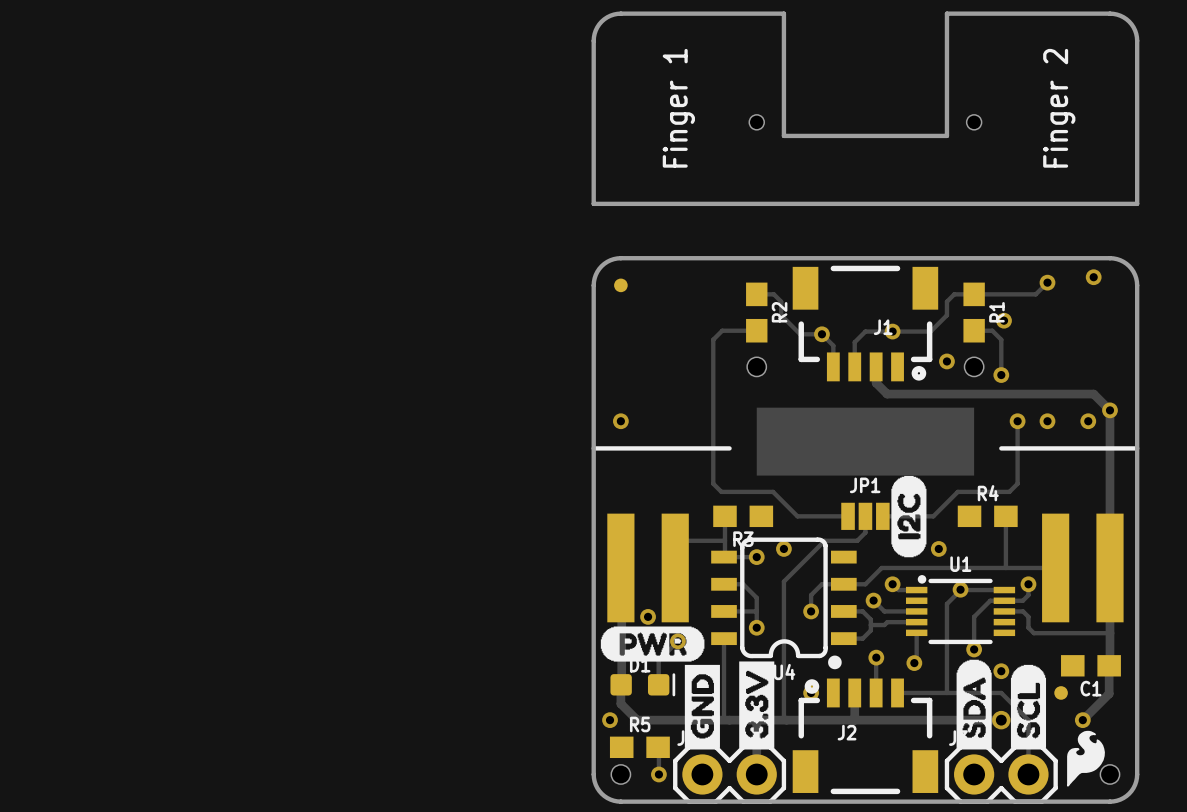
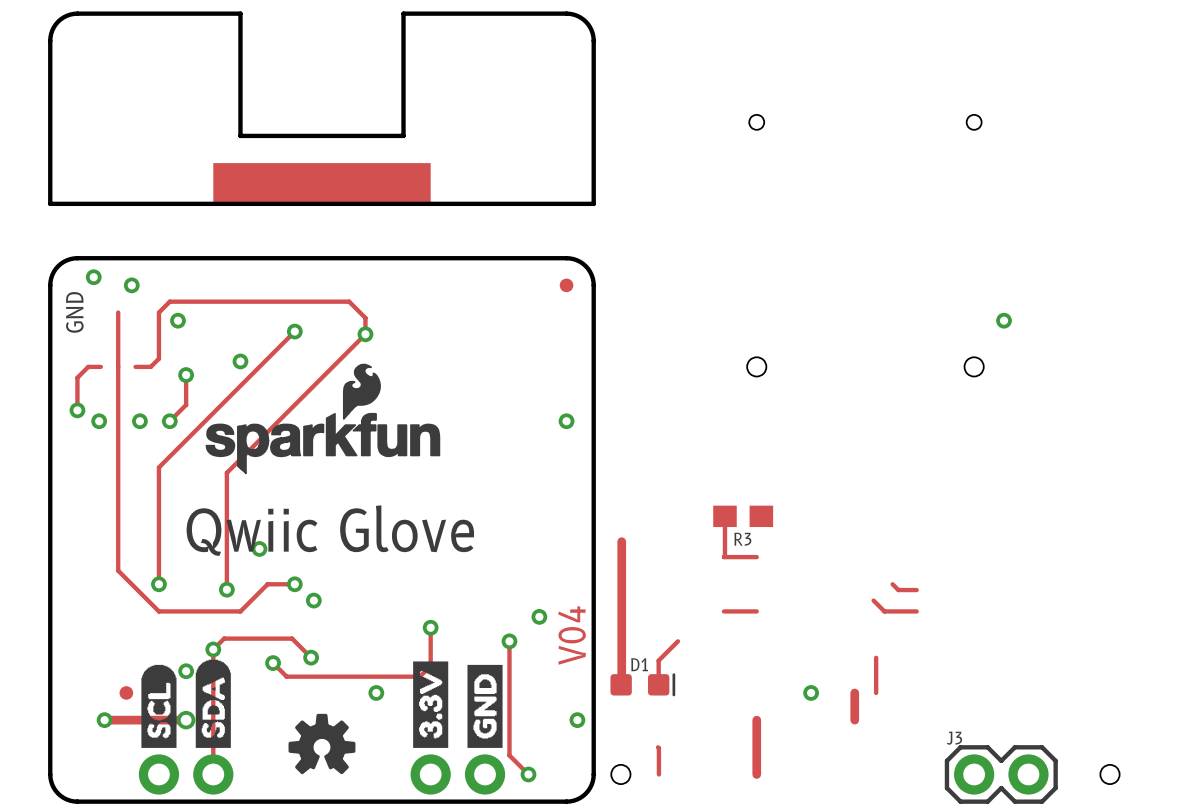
board edge: (593, 40) (599, 24) (607, 17) (617, 13) (783, 13) (783, 135) (946, 135) (946, 13) (1113, 13) (1123, 17) (1131, 24) (1137, 40) (1137, 203) (593, 203) -> (593, 40) (588, 24) (580, 17) (570, 13) (403, 13) (403, 135) (240, 135) (240, 13) (73, 13) (63, 17) (55, 24) (50, 40) (50, 203) (593, 203)
text: Finger 1 (678, 108) -> none
text: Finger 2 (1059, 108) -> none
drawing: none -> [213, 163, 431, 204]
via: none -> (93, 277)
via: (1093, 277) -> none
track: (1047, 282) (1035, 294) (954, 294) (946, 301) (946, 315) (930, 331) (865, 331) (854, 342) (854, 366) -> none
via: (1047, 282) -> none
via: none -> (131, 285)
board edge: (593, 285) (595, 274) (601, 266) (610, 260) (620, 258) (1109, 258) (1120, 260) (1129, 266) (1135, 274) (1137, 285) (1137, 774) (1135, 784) (1129, 793) (1120, 799) (1109, 801) (620, 801) (610, 799) (601, 793) (595, 784) (593, 774) -> (593, 285) (591, 274) (585, 266) (576, 260) (566, 258) (77, 258) (67, 260) (58, 266) (52, 274) (50, 285) (50, 774) (52, 784) (58, 793) (67, 799) (77, 801) (566, 801) (576, 799) (585, 793) (591, 784) (593, 774)
part position: (620, 285) -> (566, 285)
track: (756, 294) (773, 294) (781, 301) (781, 315) (800, 334) (821, 334) (833, 345) (833, 366) -> none
text: none -> GND (74, 312)
track: none -> (118, 312) (118, 570) (158, 611) (240, 611) (267, 584) (294, 584)
R2: (756, 312) -> none
R1: (974, 312) -> none
via: none -> (177, 320)
J1: (865, 323) -> none
track: (756, 330) (722, 330) (713, 339) (713, 483) (721, 491) (773, 491) (797, 516) (848, 516) -> none
track: (974, 330) (992, 330) (1001, 339) (1001, 375) -> none
track: none -> (294, 331) (158, 467) (158, 584)
via: none -> (294, 331)
via: (892, 331) -> none
via: none -> (365, 334)
via: (821, 334) -> none
via: none -> (240, 361)
via: (946, 361) -> none
drawing: none -> [205, 363, 441, 475]
track: none -> (100, 366) (88, 366) (77, 377) (77, 410)
track: none -> (135, 366) (150, 366) (158, 358) (158, 312) (169, 301) (349, 301) (365, 317) (365, 334) (226, 472) (226, 589)
track: (876, 366) (876, 383) (887, 394) (1093, 394) (1109, 410) (1109, 693) (1082, 720) -> none
track: none -> (186, 375) (186, 404) (169, 421)
via: none -> (186, 375)
via: (1001, 375) -> none
drawing: [756, 407, 975, 558] -> none
via: none -> (77, 410)
via: (1109, 410) -> none
via: none -> (99, 421)
via: none -> (139, 421)
via: none -> (169, 421)
via position: (620, 421) -> (566, 421)
track: (1017, 421) (1017, 483) (1009, 491) (957, 491) (933, 516) (882, 516) -> none
via: (1017, 421) -> none
via: (1047, 421) -> none
via: (1088, 421) -> none
line: (593, 448) (729, 448) -> none
line: (1001, 448) (1137, 448) -> none
track: (865, 516) (865, 532) (857, 540) (824, 540) (783, 581) (783, 717) (786, 720) -> none
JP1: (865, 516) -> none
R4: (987, 516) -> none
track: (1005, 516) (1005, 567) -> none
text: none -> Qwiic Glove (330, 530)
track: (724, 540) (675, 540) (675, 567) -> none
via: none -> (259, 548)
via: (783, 548) -> none
via: (938, 548) -> none
via: (756, 557) -> none
part: (648, 567) -> none
track: (1055, 567) (881, 567) (865, 584) (821, 584) (811, 595) (811, 611) -> none
part: (1082, 567) -> none
via: none -> (158, 584)
via: none -> (294, 584)
track: (724, 584) (743, 584) (756, 597) (756, 627) -> none
via: (892, 584) -> none
track: (1028, 584) (1028, 595) (1022, 600) (990, 600) (974, 616) (974, 649) -> none
via: (1028, 584) -> none
via: none -> (226, 589)
via: (960, 589) -> none
track: (960, 590) (946, 603) (946, 692) -> none
track: (960, 590) (1004, 590) -> none
via: none -> (313, 600)
via: (873, 600) -> none
U4: (783, 603) -> none
U1: (960, 609) -> none
via: (811, 611) -> none
track: (843, 611) (862, 611) (870, 619) (870, 630) (862, 638) (843, 638) -> none
track: (1004, 611) (1023, 611) (1028, 616) (1028, 627) (1033, 633) (1109, 633) -> none
via: none -> (539, 616)
via: (648, 616) -> none
track: (916, 622) (887, 622) (884, 625) (870, 625) -> none
drawing: [600, 626, 705, 662] -> none
track: none -> (430, 627) (430, 665) (419, 676) (286, 676) (273, 663)
via: none -> (430, 627)
via: (756, 627) -> none
text: none -> V04 (572, 635)
track: (916, 632) (916, 660) (914, 663) -> none
track: (724, 638) (724, 720) (729, 720) -> none
track: none -> (509, 641) (509, 755) (528, 774)
via: none -> (509, 641)
via: (677, 641) -> none
via: none -> (213, 649)
via: (974, 649) -> none
track: none -> (311, 657) (292, 638) (224, 638) (213, 649) (213, 774)
via: none -> (311, 657)
via: (876, 657) -> none
drawing: none -> [141, 659, 231, 748]
drawing: [956, 659, 1105, 787] -> none
via: none -> (273, 663)
via: (914, 663) -> none
C1: (1090, 665) -> none
via: none -> (186, 671)
via: (1001, 671) -> none
track: (620, 680) (620, 703) (637, 720) (1001, 720) -> none
part: none -> (126, 692)
via: none -> (376, 692)
track: (897, 692) (1001, 692) (1028, 720) (1028, 774) -> none
part: (1061, 692) -> none
drawing position: (756, 704) -> (430, 704)
drawing position: (702, 706) -> (485, 706)
drawing: none -> [288, 713, 356, 775]
track: none -> (104, 720) (186, 720)
via: none -> (104, 720)
via: none -> (186, 720)
via position: (610, 720) -> (577, 720)
via: (1001, 720) -> none
via: (1082, 720) -> none
J2: (865, 736) -> none
R5: (639, 747) -> none
part: none -> (186, 774)
via: none -> (528, 774)
via: (658, 774) -> none
part side: top (729, 774) -> bottom (457, 774)

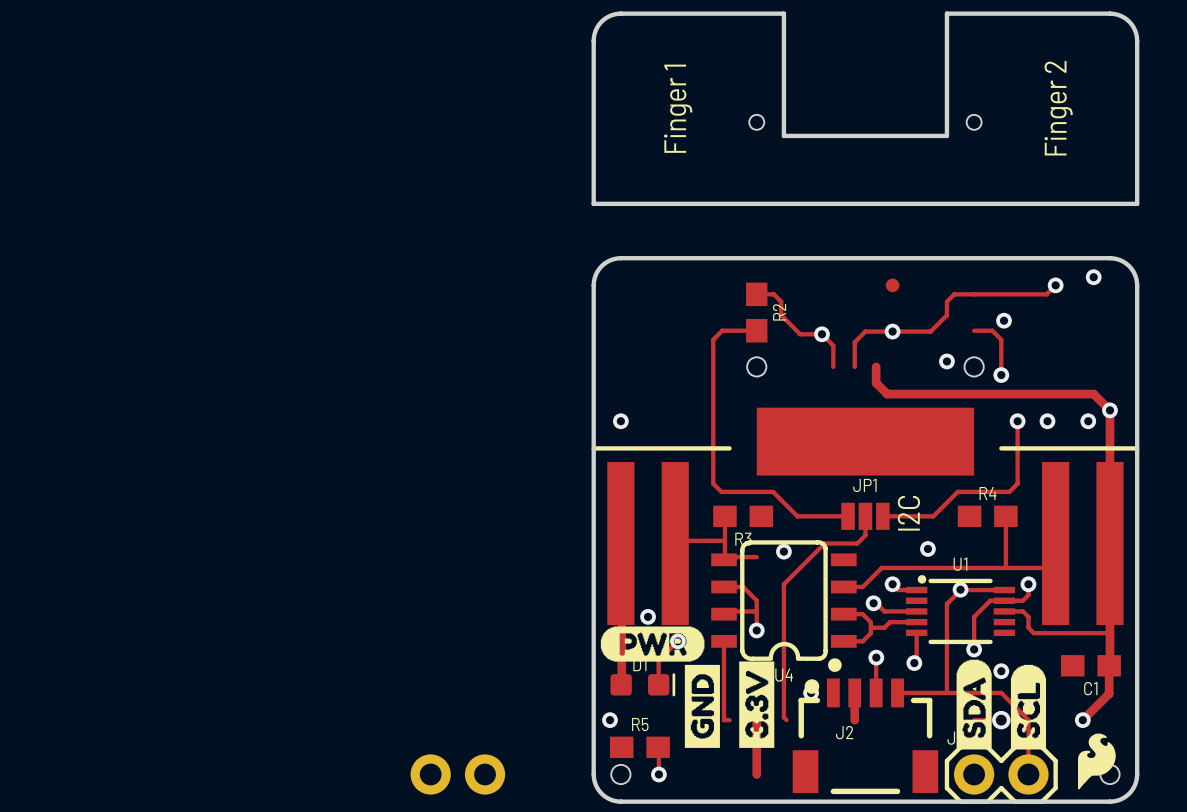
board edge: (593, 40) (588, 24) (580, 17) (570, 13) (403, 13) (403, 135) (240, 135) (240, 13) (73, 13) (63, 17) (55, 24) (50, 40) (50, 203) (593, 203) -> (593, 40) (599, 24) (607, 17) (617, 13) (783, 13) (783, 135) (946, 135) (946, 13) (1113, 13) (1123, 17) (1131, 24) (1137, 40) (1137, 203) (593, 203)
text: none -> Finger 1 (678, 108)
text: none -> Finger 2 (1058, 108)
drawing: [213, 163, 431, 204] -> none
via: (93, 277) -> none
via: none -> (1093, 277)
via: (131, 285) -> none
part: (566, 285) -> none
board edge: (593, 285) (591, 274) (585, 266) (576, 260) (566, 258) (77, 258) (67, 260) (58, 266) (52, 274) (50, 285) (50, 774) (52, 784) (58, 793) (67, 799) (77, 801) (566, 801) (576, 799) (585, 793) (591, 784) (593, 774) -> (593, 285) (595, 274) (601, 266) (610, 260) (620, 258) (1109, 258) (1120, 260) (1129, 266) (1135, 274) (1137, 285) (1137, 774) (1135, 784) (1129, 793) (1120, 799) (1109, 801) (620, 801) (610, 799) (601, 793) (595, 784) (593, 774)
part: none -> (892, 285)
track: none -> (1055, 285) (1046, 294) (954, 294) (946, 301) (946, 315) (930, 331) (865, 331) (854, 342) (854, 366)
via: none -> (1055, 285)
track: none -> (756, 294) (773, 294) (781, 301) (781, 315) (800, 334) (821, 334) (833, 345) (833, 366)
text: GND (74, 312) -> none
track: (118, 312) (118, 570) (158, 611) (240, 611) (267, 584) (294, 584) -> none
R2: none -> (756, 312)
via: (177, 320) -> none
track: none -> (756, 330) (722, 330) (713, 339) (713, 483) (721, 491) (773, 491) (797, 516) (848, 516)
track: none -> (974, 330) (992, 330) (1001, 339) (1001, 375)
track: (294, 331) (158, 467) (158, 584) -> none
via: (294, 331) -> none
via: none -> (892, 331)
via: (365, 334) -> none
via: none -> (821, 334)
via: (240, 361) -> none
via: none -> (946, 361)
drawing: [205, 363, 441, 475] -> none
track: (100, 366) (88, 366) (77, 377) (77, 410) -> none
track: (135, 366) (150, 366) (158, 358) (158, 312) (169, 301) (349, 301) (365, 317) (365, 334) (226, 472) (226, 589) -> none
track: none -> (876, 366) (876, 383) (887, 394) (1093, 394) (1109, 410) (1109, 665)
track: (186, 375) (186, 404) (169, 421) -> none
via: (186, 375) -> none
via: none -> (1001, 375)
drawing: none -> [756, 407, 975, 476]
via: (77, 410) -> none
via: none -> (1109, 410)
via: (99, 421) -> none
via: (139, 421) -> none
via: (169, 421) -> none
via position: (566, 421) -> (620, 421)
track: none -> (1017, 421) (1017, 483) (1009, 491) (957, 491) (933, 516) (882, 516)
via: none -> (1017, 421)
via: none -> (1047, 421)
via: none -> (1088, 421)
line: none -> (593, 448) (729, 448)
line: none -> (1001, 448) (1137, 448)
text: none -> I2C (908, 513)
track: none -> (865, 516) (865, 535) (857, 543) (824, 543) (783, 584) (783, 717) (786, 720)
JP1: none -> (865, 516)
R4: none -> (987, 516)
track: none -> (1005, 516) (1005, 567)
text: Qwiic Glove (330, 530) -> none
track: none -> (724, 540) (675, 540) (675, 543)
part: none -> (648, 543)
track: none -> (1055, 543) (1055, 567) (881, 567) (862, 586) (843, 586)
part: none -> (1082, 543)
via: (259, 548) -> none
via: none -> (927, 548)
via: none -> (783, 551)
via: (158, 584) -> none
via: (294, 584) -> none
via: none -> (892, 584)
track: none -> (1028, 584) (1028, 595) (1022, 600) (990, 600) (974, 616) (974, 649)
via: none -> (1028, 584)
track: none -> (724, 586) (743, 586) (756, 600) (756, 630)
via: (226, 589) -> none
via: none -> (960, 589)
track: none -> (960, 590) (946, 603) (946, 692)
track: none -> (960, 590) (1004, 590)
via: (313, 600) -> none
via: none -> (873, 603)
U4: none -> (783, 606)
U1: none -> (960, 609)
track: none -> (1004, 611) (1023, 611) (1028, 616) (1028, 627) (1033, 633) (1109, 633)
track: none -> (843, 614) (862, 614) (870, 622) (870, 633) (862, 641) (843, 641)
via: (539, 616) -> none
via: none -> (648, 616)
track: none -> (916, 622) (890, 622) (884, 627) (870, 627)
drawing: none -> [600, 626, 705, 662]
track: (430, 627) (430, 665) (419, 676) (286, 676) (273, 663) -> none
via: (430, 627) -> none
via: none -> (756, 630)
track: none -> (916, 632) (916, 660) (914, 663)
text: V04 (572, 635) -> none
track: (509, 641) (509, 755) (528, 774) -> none
via: (509, 641) -> none
via: none -> (677, 641)
track: none -> (724, 641) (724, 720) (729, 720)
via: (213, 649) -> none
via: none -> (974, 649)
track: (311, 657) (292, 638) (224, 638) (213, 649) (213, 774) -> none
via: (311, 657) -> none
via: none -> (876, 657)
drawing: [141, 659, 231, 748] -> none
drawing: none -> [956, 659, 1047, 748]
via: (273, 663) -> none
via: none -> (914, 663)
C1: none -> (1090, 665)
track: none -> (1109, 665) (1109, 693) (1082, 720)
via: (186, 671) -> none
via: none -> (1001, 671)
part: (126, 692) -> none
via: (376, 692) -> none
track: none -> (897, 692) (1001, 692) (1028, 720) (1028, 774)
drawing position: (430, 704) -> (756, 704)
drawing position: (485, 706) -> (702, 706)
drawing: [288, 713, 356, 775] -> none
track: (104, 720) (186, 720) -> none
via: (104, 720) -> none
via: (186, 720) -> none
via position: (577, 720) -> (610, 720)
track: none -> (974, 720) (985, 720)
via: none -> (1001, 720)
via: none -> (1082, 720)
drawing: none -> [1077, 733, 1116, 790]
J2: none -> (865, 736)
R5: none -> (639, 747)
part: (186, 774) -> none
via: (528, 774) -> none
via: none -> (658, 774)

